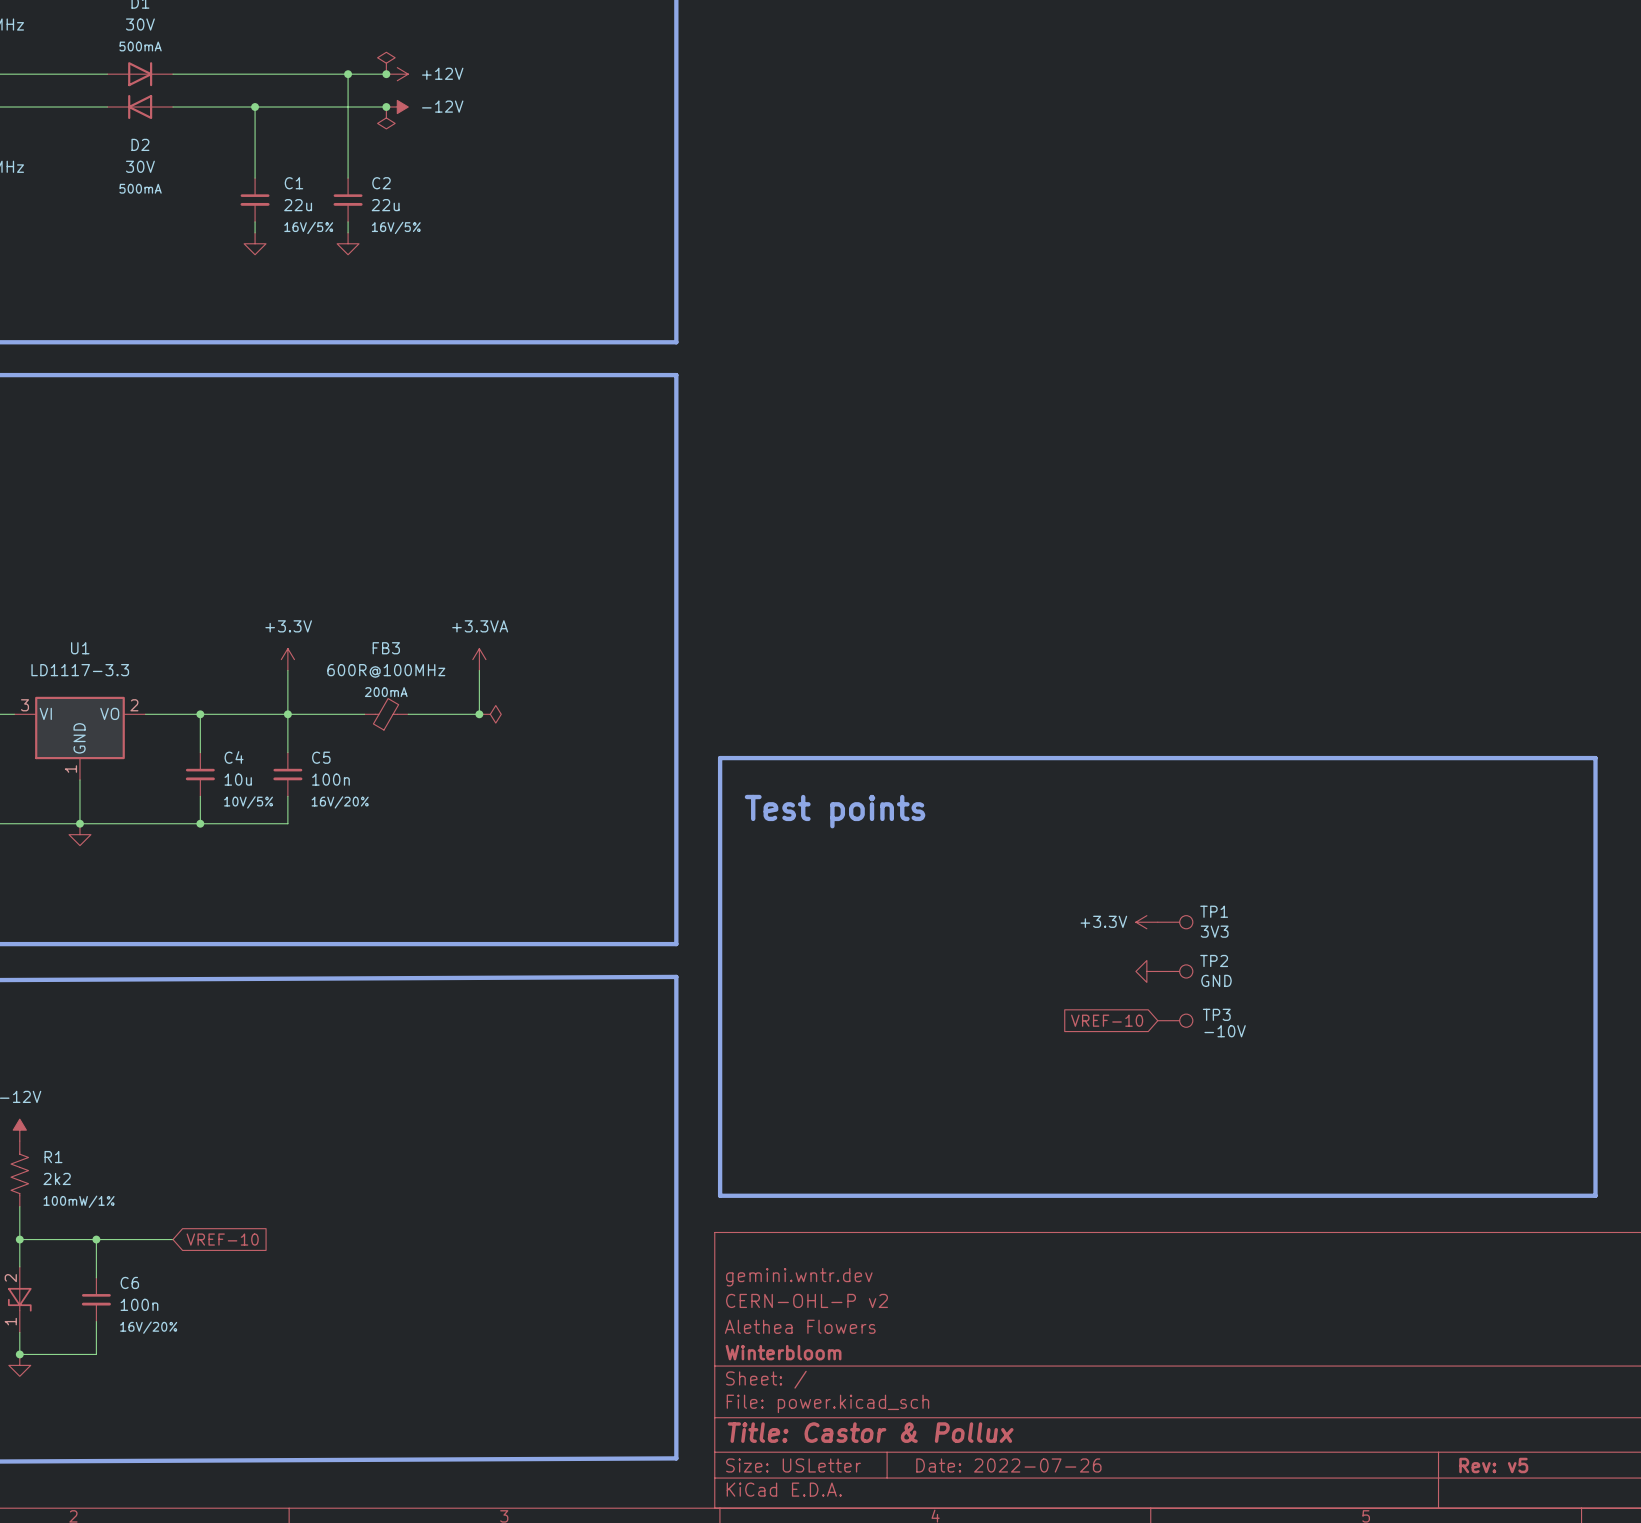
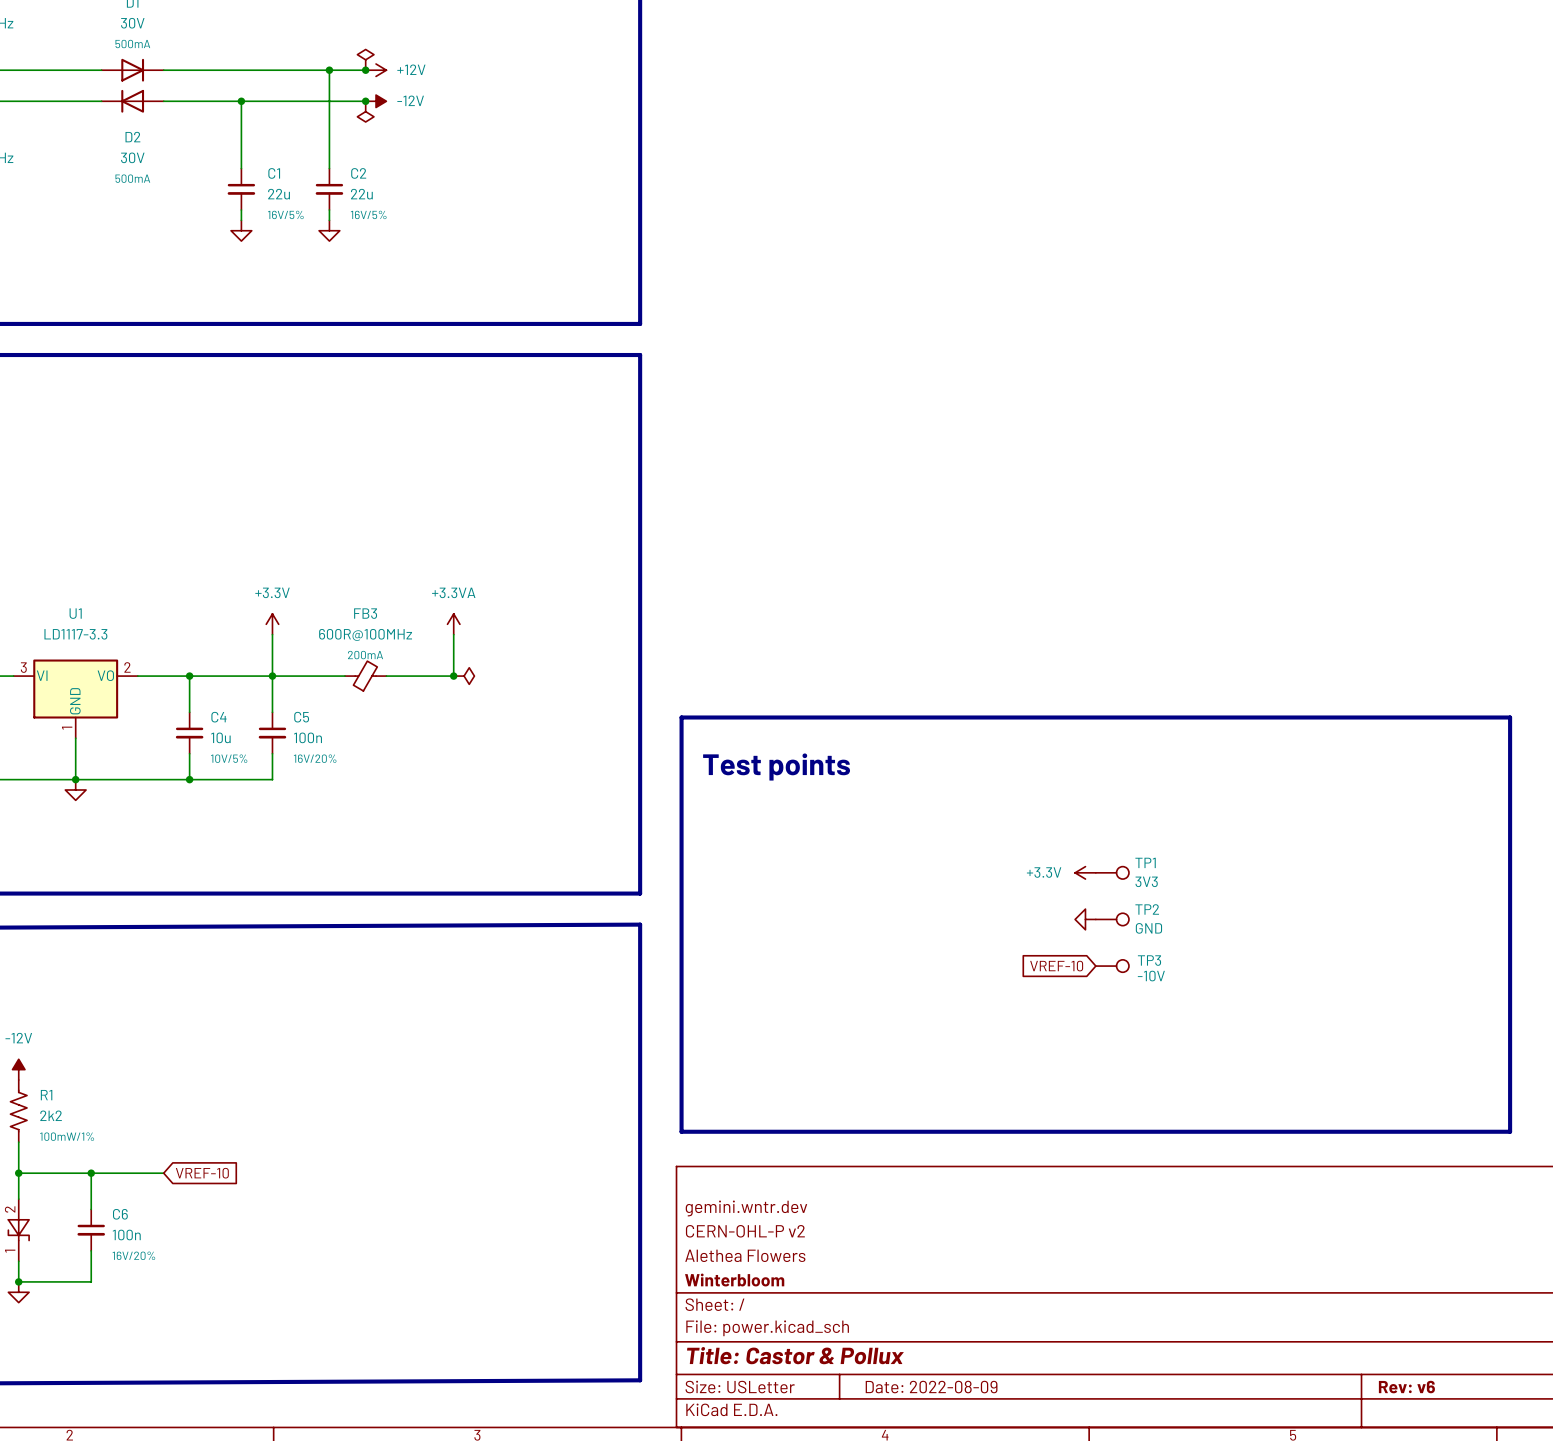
title block: Date: 2022-07-26 (1008, 1465) -> Date: 2022-08-09 (931, 1387)
title block: Rev: v5 (1493, 1465) -> Rev: v6 (1406, 1387)

